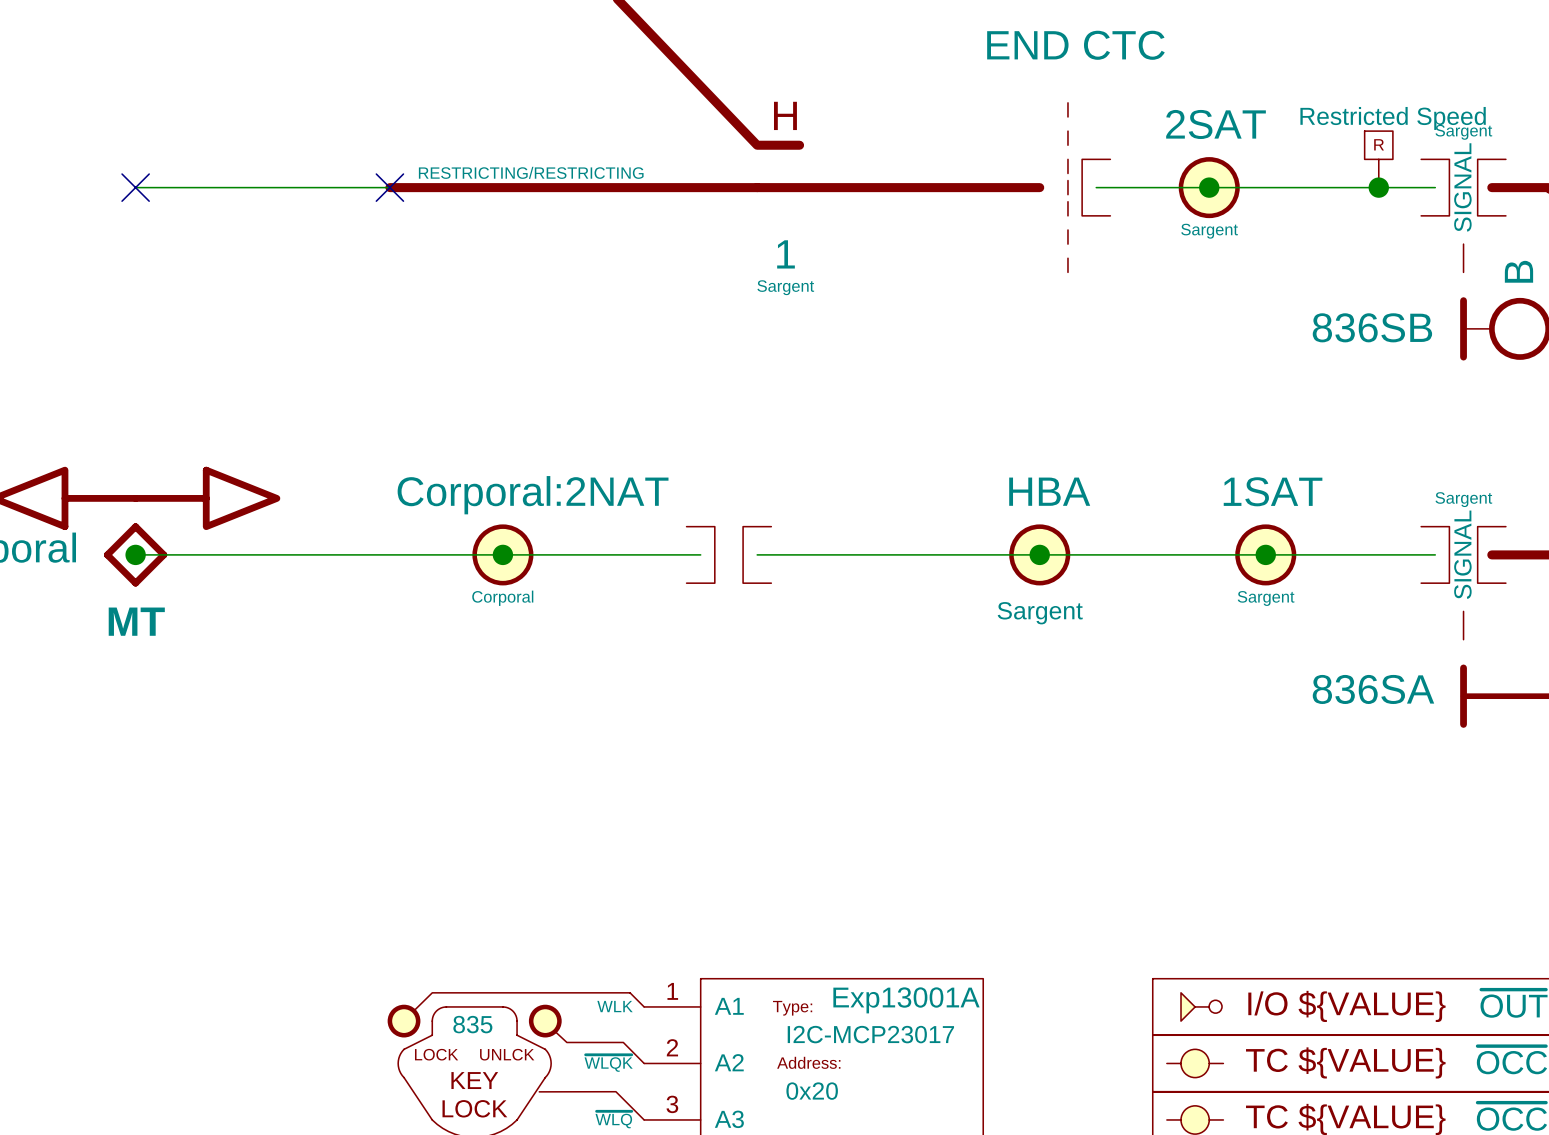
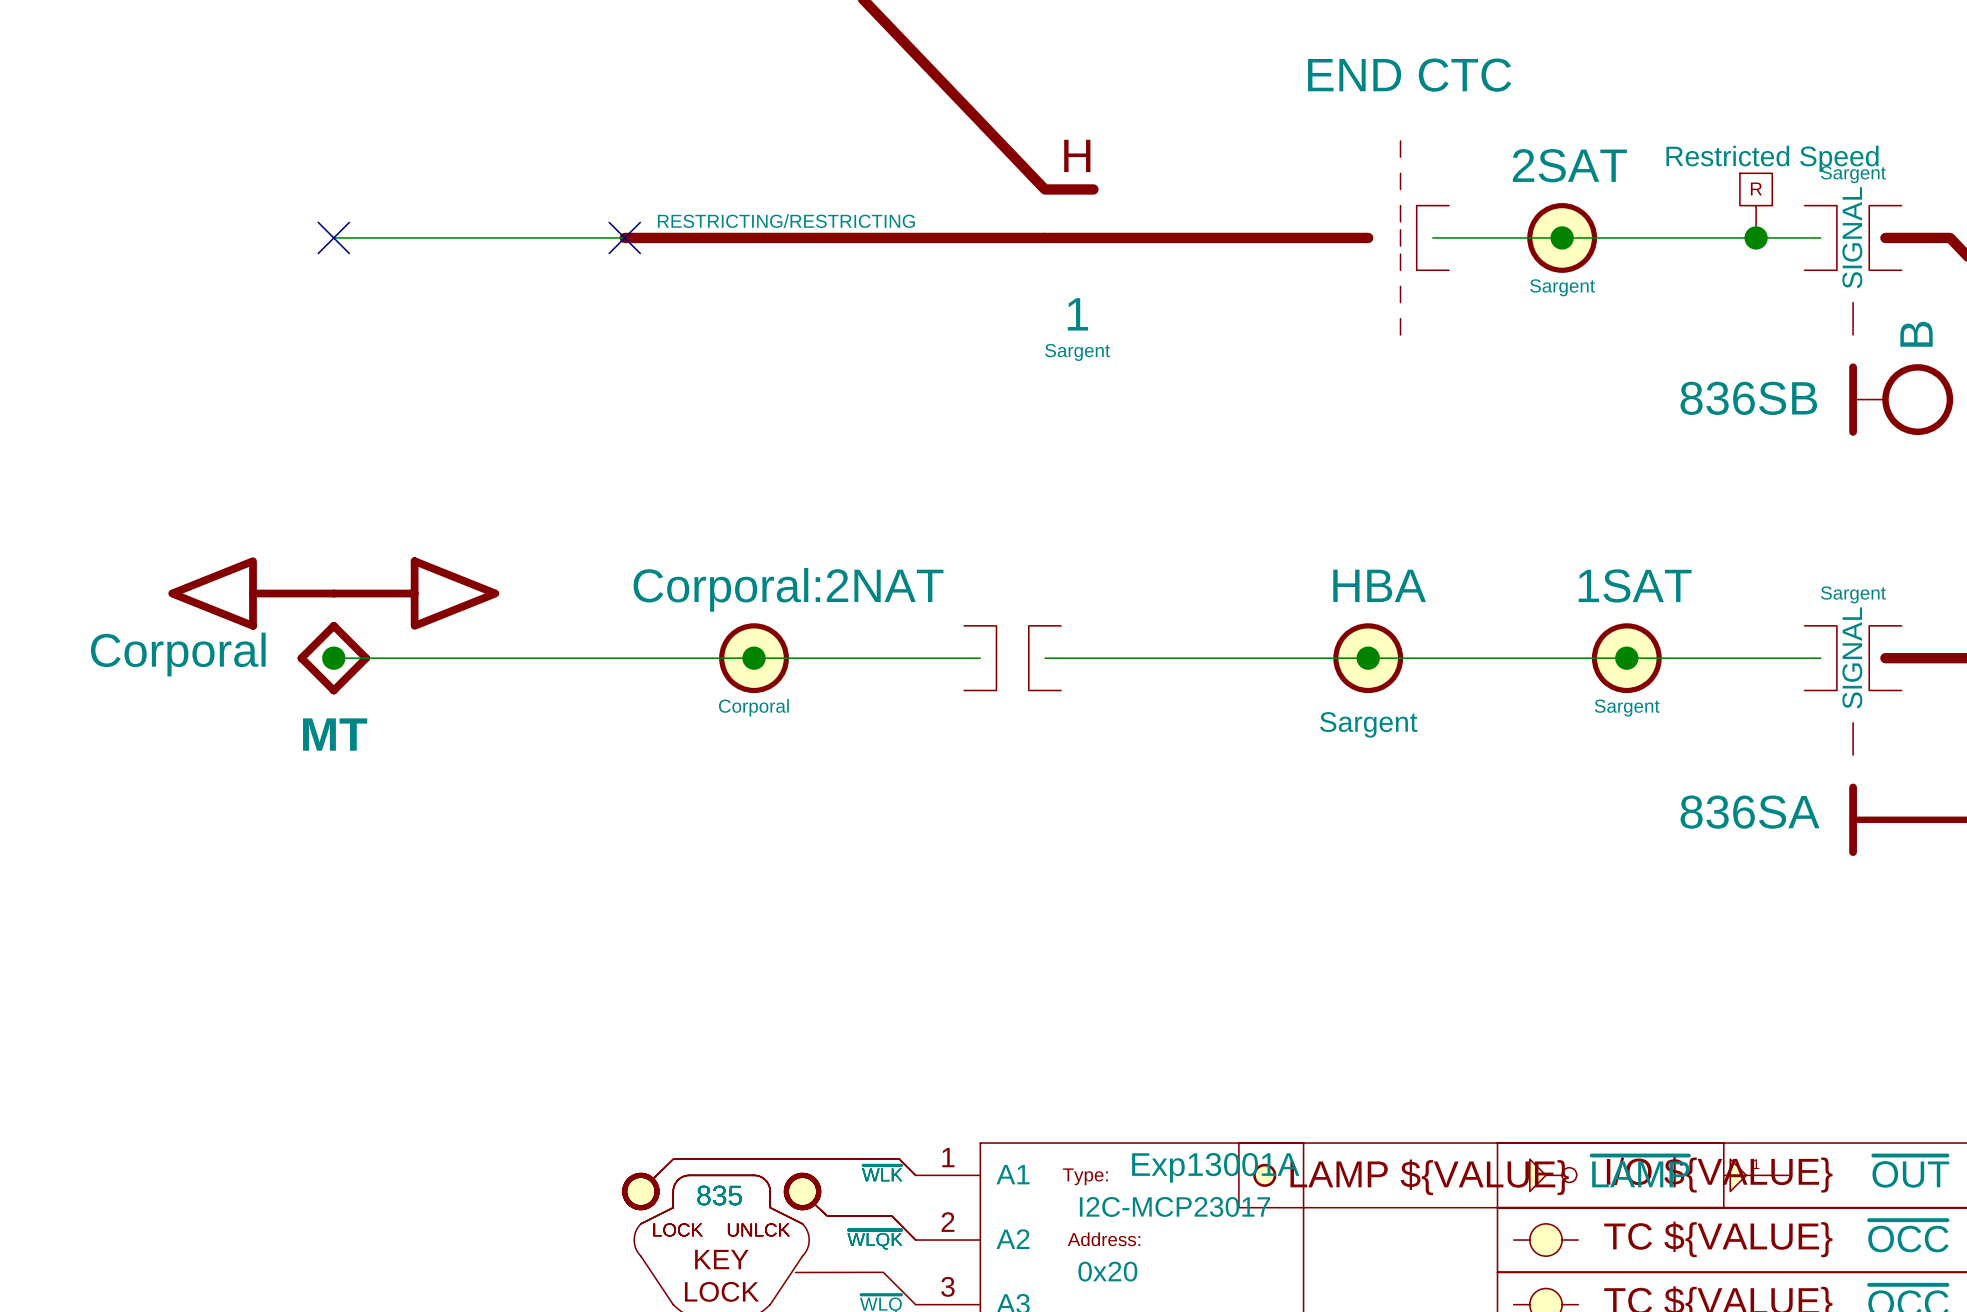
part: none -> (1513, 1175)
part: none -> 835 (768, 1199)

